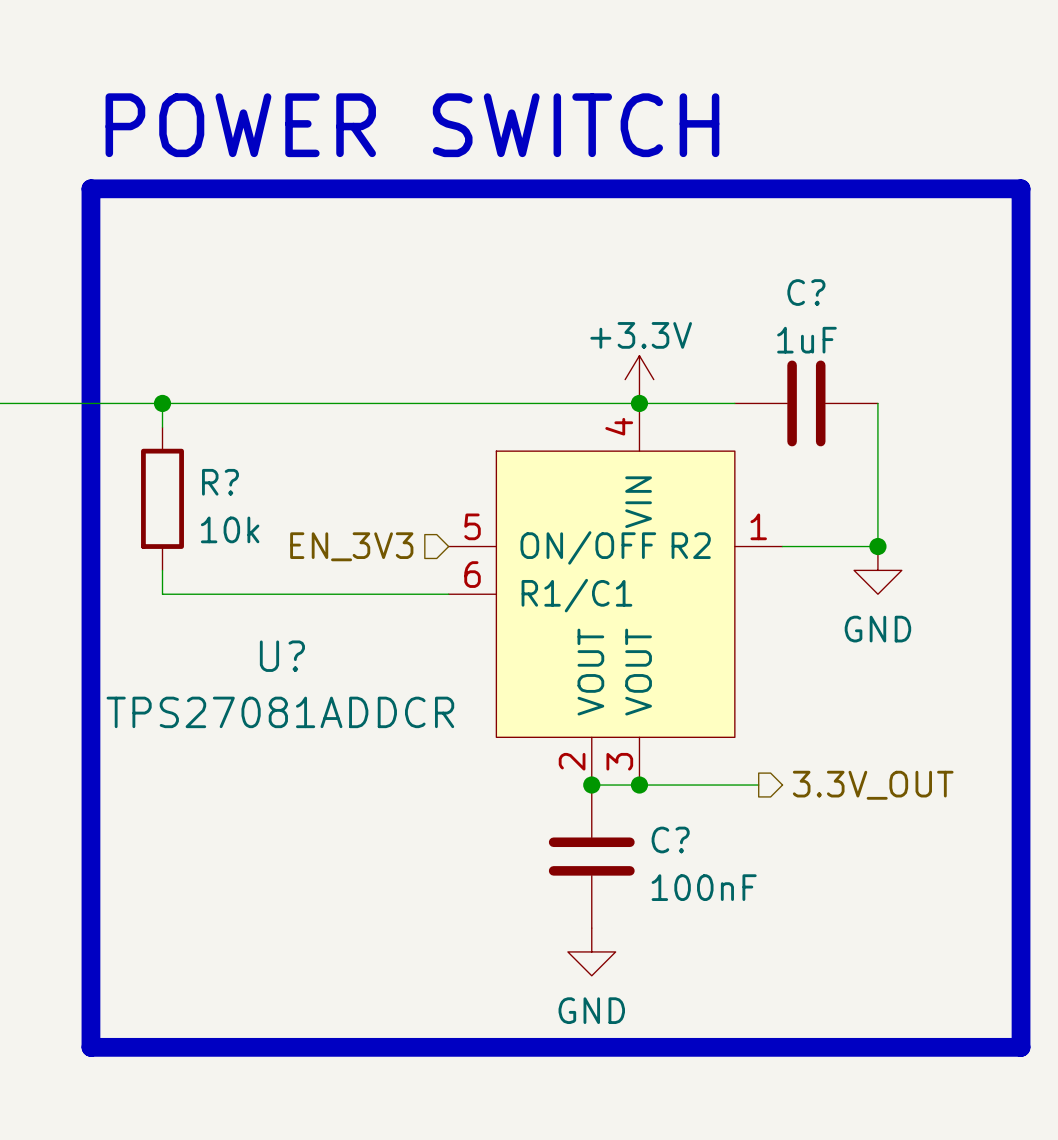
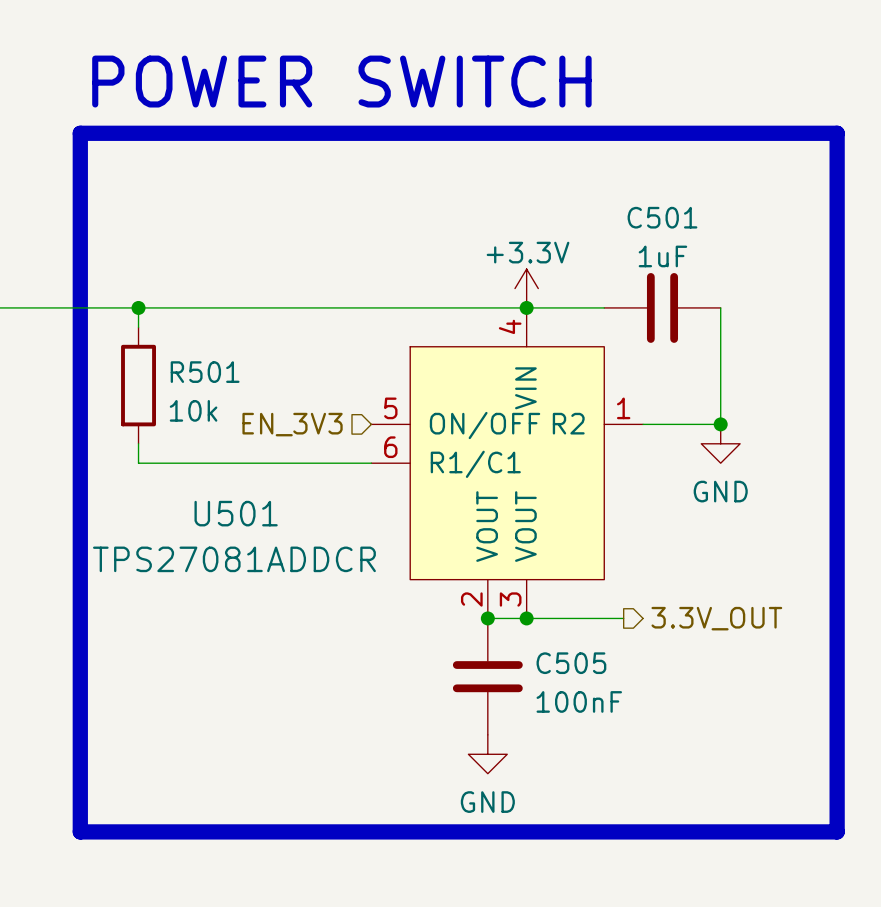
C? name: C? (806, 292) -> C501 (662, 217)
R? name: R? (220, 482) -> R501 (205, 372)
U? name: U? (282, 656) -> U501 (236, 513)
C? name: C? (670, 839) -> C505 (571, 663)

